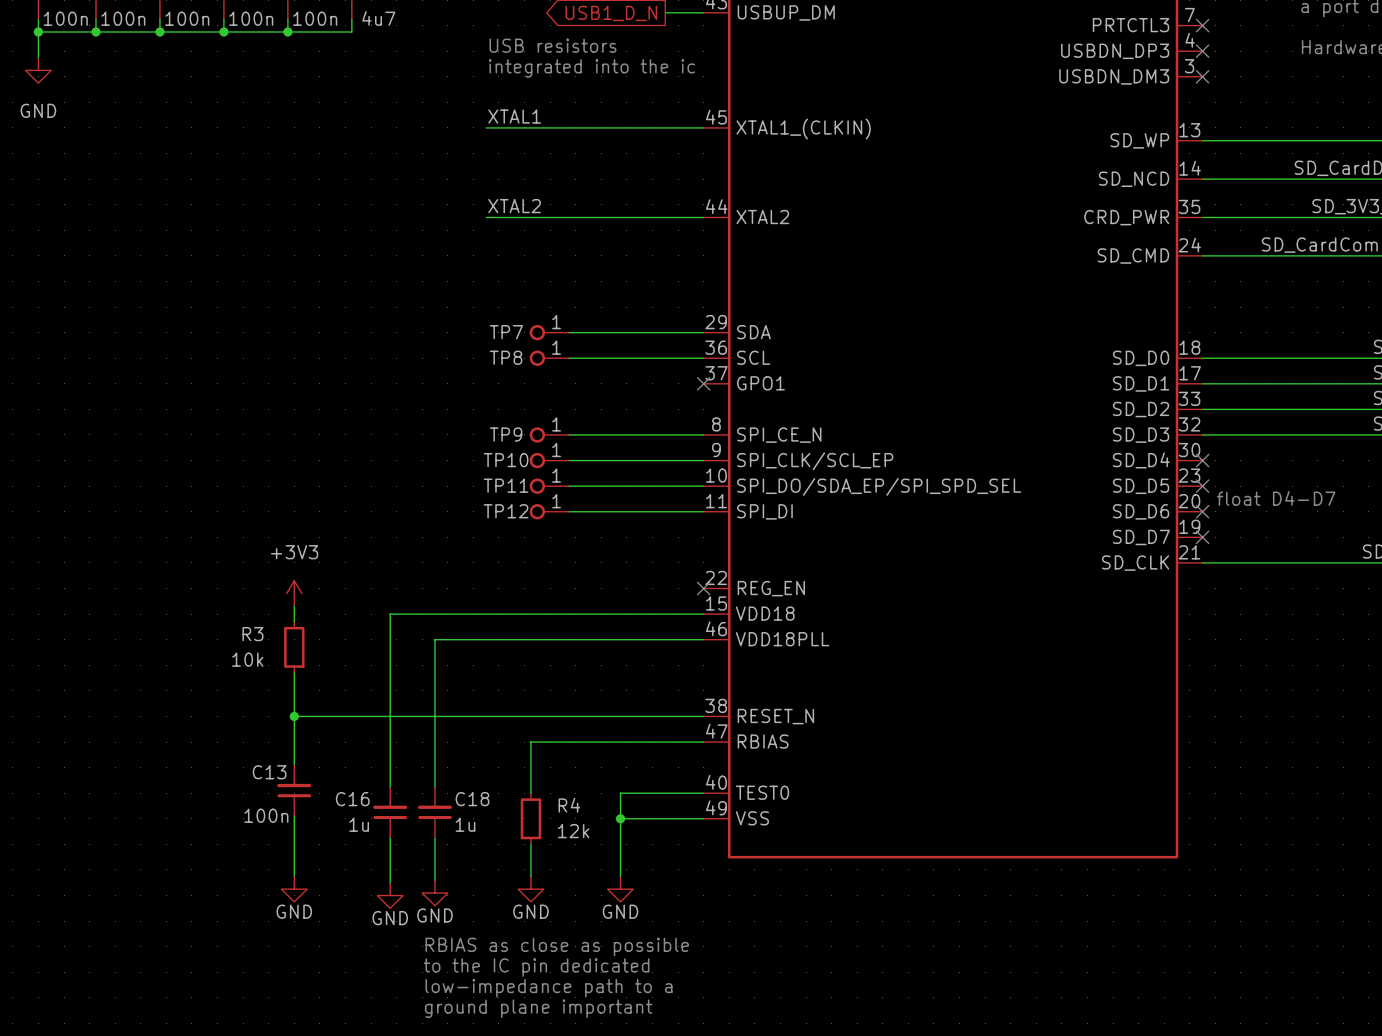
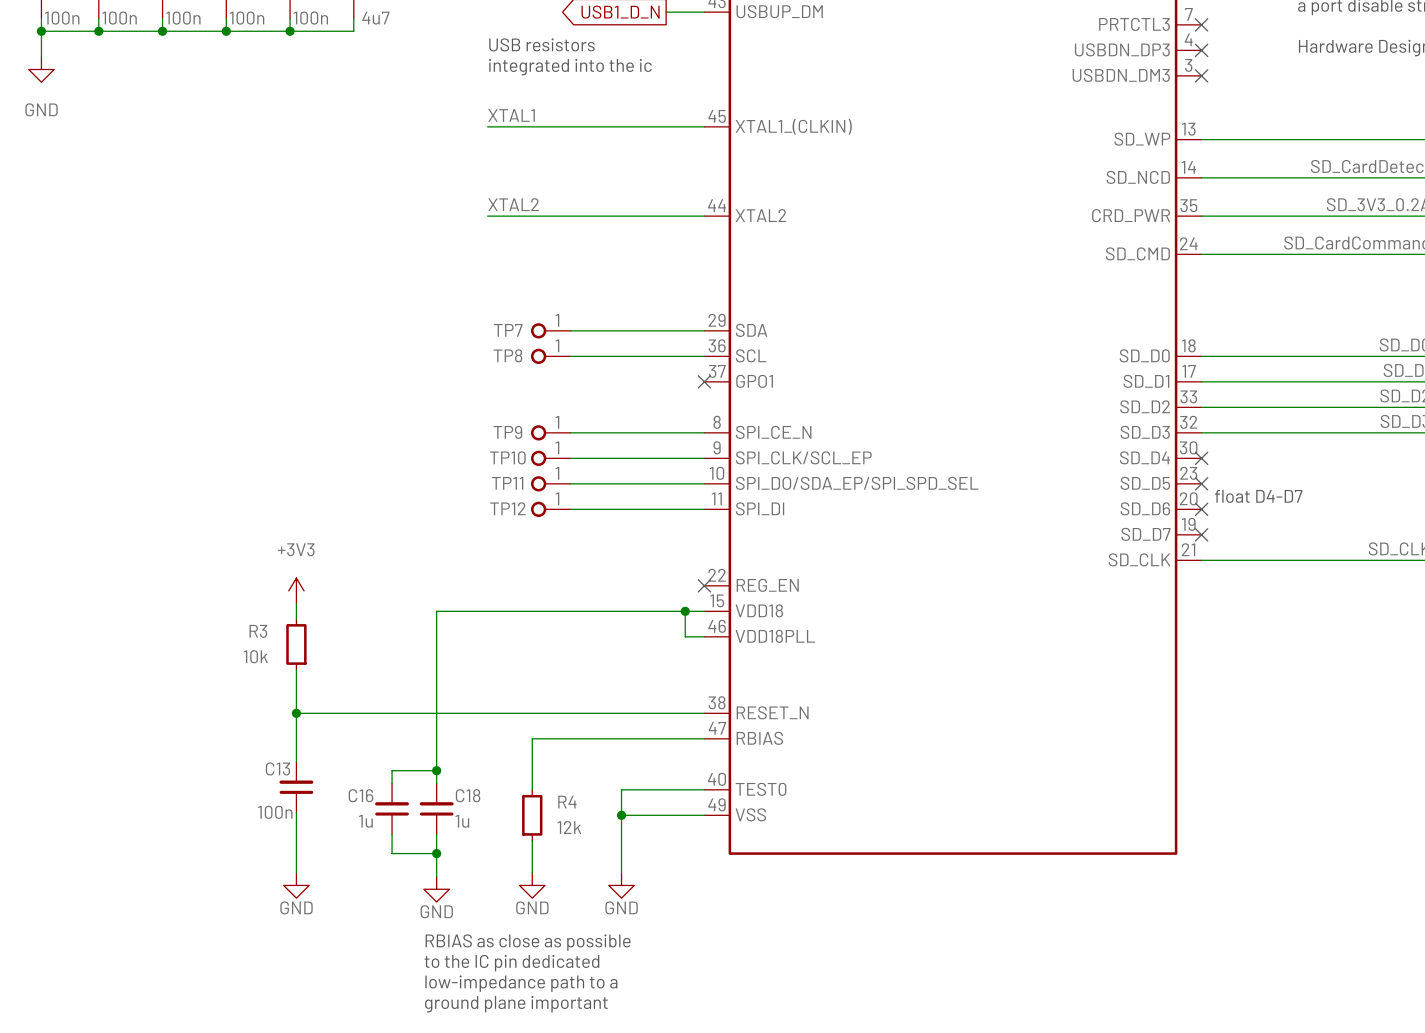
wire: (435, 614) (390, 614) (390, 774) -> (436, 611) (436, 636)
junction: none -> (685, 611)
wire: (435, 639) (684, 639) -> (685, 611) (685, 636)
wire: none -> (392, 770) (436, 770)
junction: none -> (436, 770)
wire: (390, 857) (390, 882) -> (392, 853) (436, 853)
junction: none -> (436, 853)
power symbol: GND (390, 895) -> none

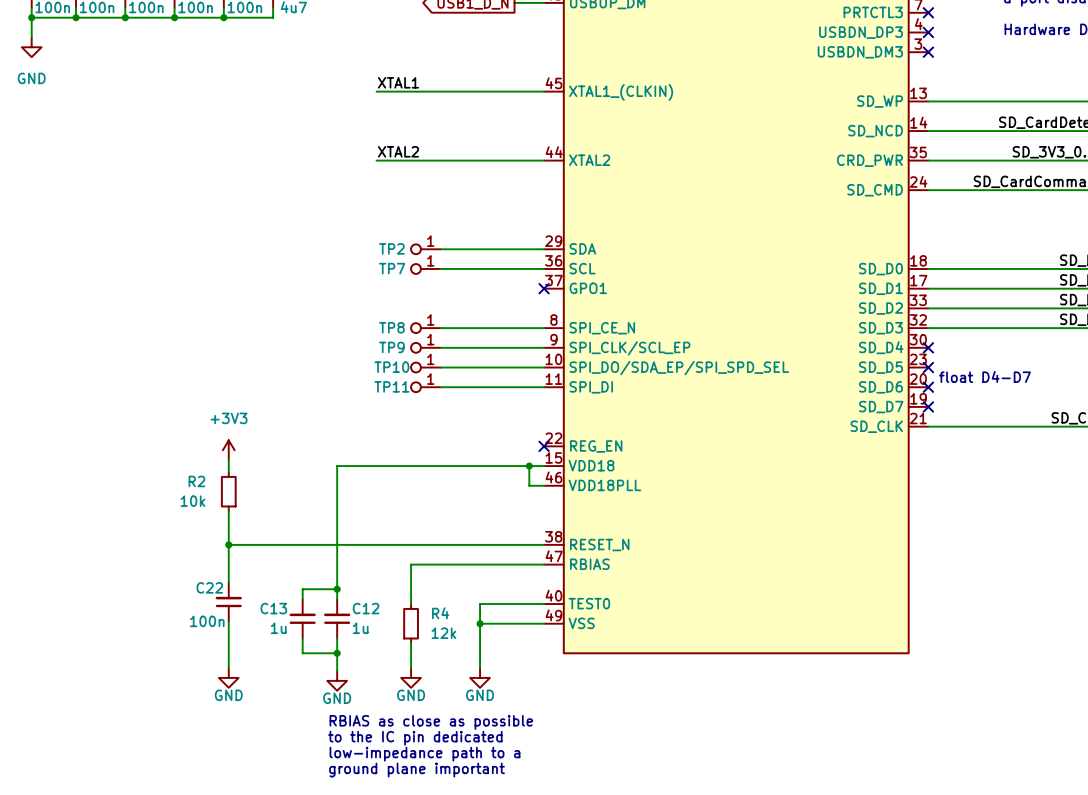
text: USB resistors (541, 44) -> none
text: integrated into the ic (570, 67) -> none
TP7 name: TP7 (508, 330) -> TP2 (391, 248)
TP8 name: TP8 (507, 355) -> TP7 (392, 268)
TP9 name: TP9 (507, 432) -> TP8 (391, 327)
TP10 name: TP10 (507, 457) -> TP9 (391, 347)
TP11 name: TP11 (507, 483) -> TP10 (391, 367)
TP12 name: TP12 (507, 508) -> TP11 (391, 386)
R3 name: R3 (258, 631) -> R2 (196, 481)
C13 name: C13 (277, 768) -> C22 (209, 587)
C16 name: C16 (360, 795) -> C13 (273, 608)
C18 name: C18 (468, 795) -> C12 (366, 608)

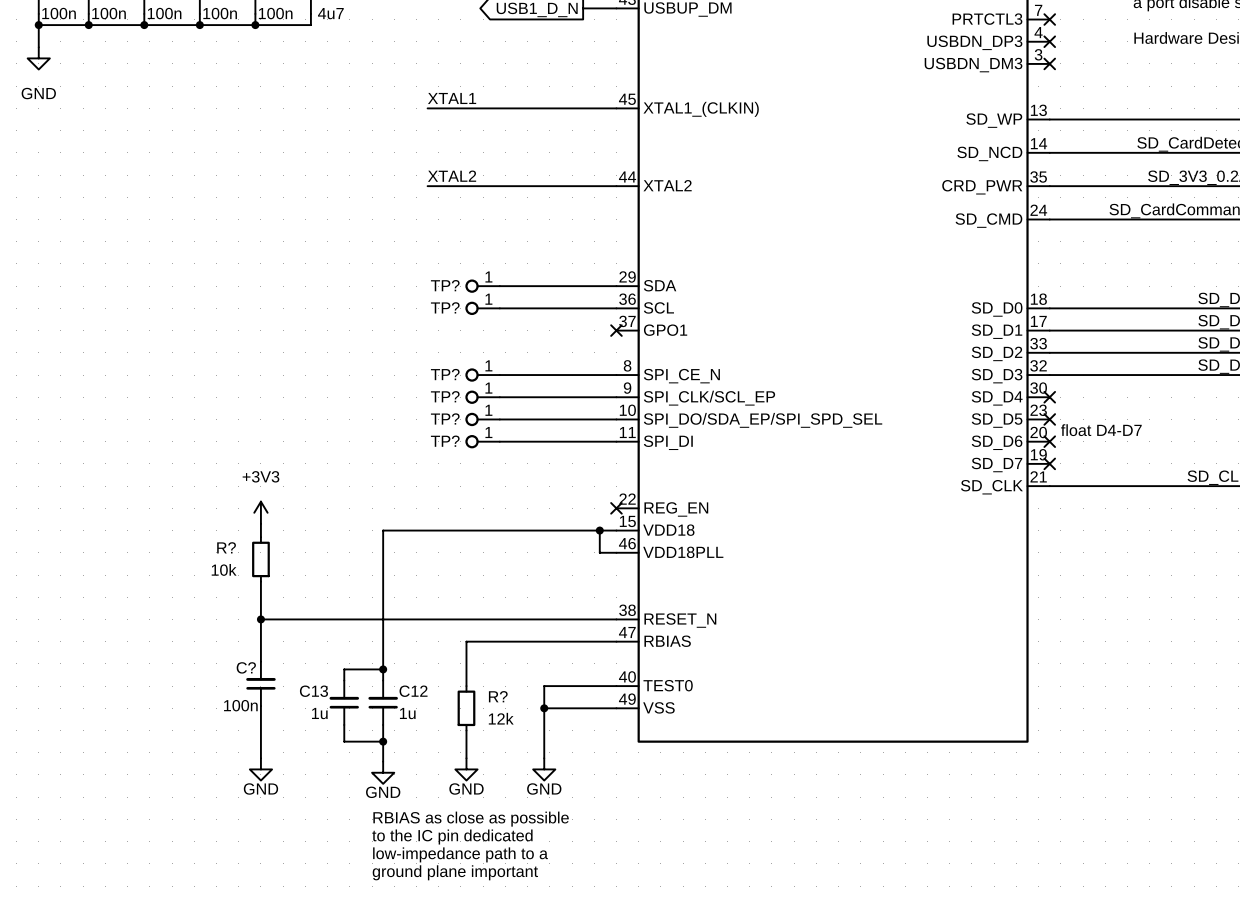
TP2 name: TP2 (391, 248) -> TP? (445, 285)
TP7 name: TP7 (392, 268) -> TP? (445, 307)
TP8 name: TP8 (391, 327) -> TP? (445, 374)
TP9 name: TP9 (391, 347) -> TP? (445, 396)
TP10 name: TP10 (391, 367) -> TP? (445, 418)
TP11 name: TP11 (391, 386) -> TP? (445, 441)
R2 name: R2 (196, 481) -> R? (226, 547)
C22 name: C22 (209, 587) -> C? (246, 667)
R4 name: R4 (440, 613) -> R? (498, 696)

